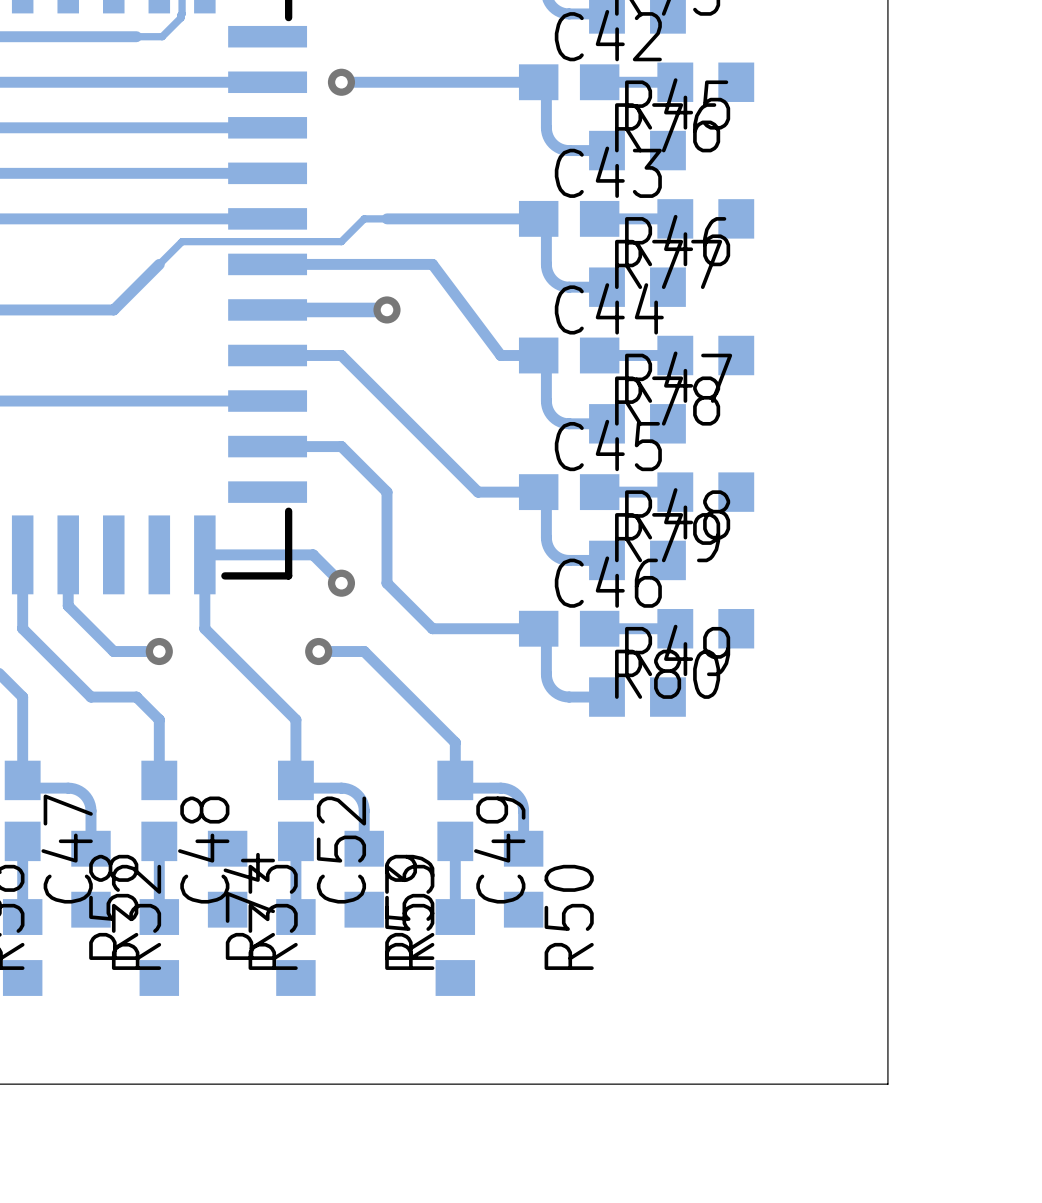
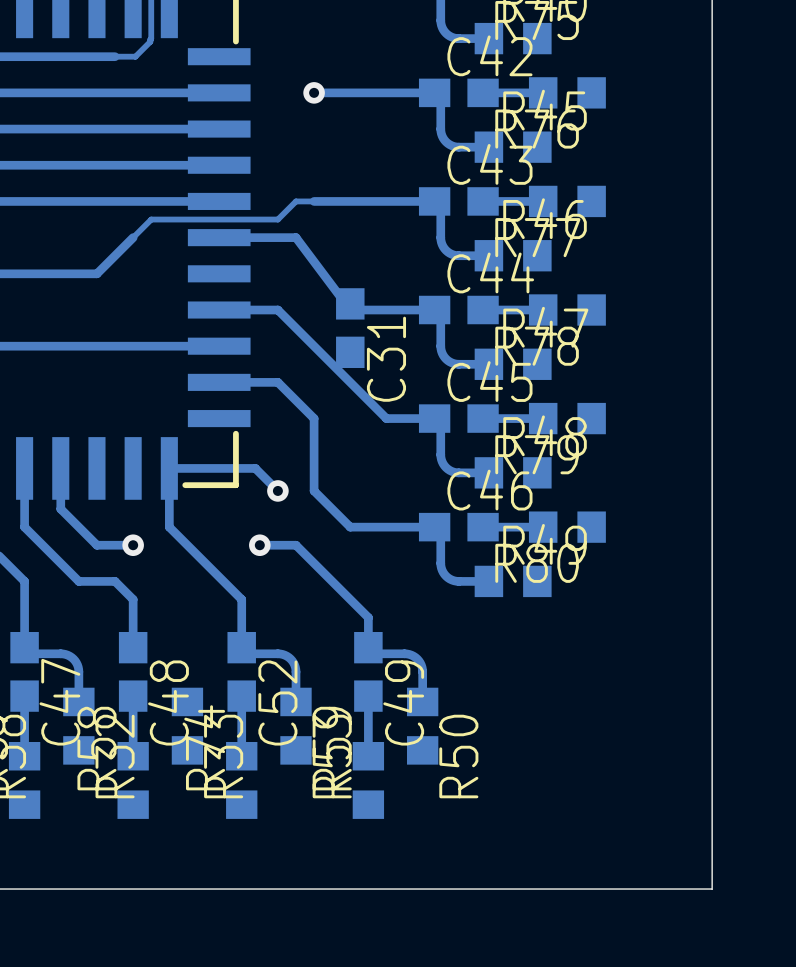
via position: (341, 82) -> (314, 92)
track: (387, 82) (341, 82) -> none
track: (364, 264) (432, 264) (500, 355) -> (296, 237) (350, 310) (404, 310)
track: (387, 309) (267, 309) -> none
via: (387, 309) -> none
C31: none -> (350, 328)

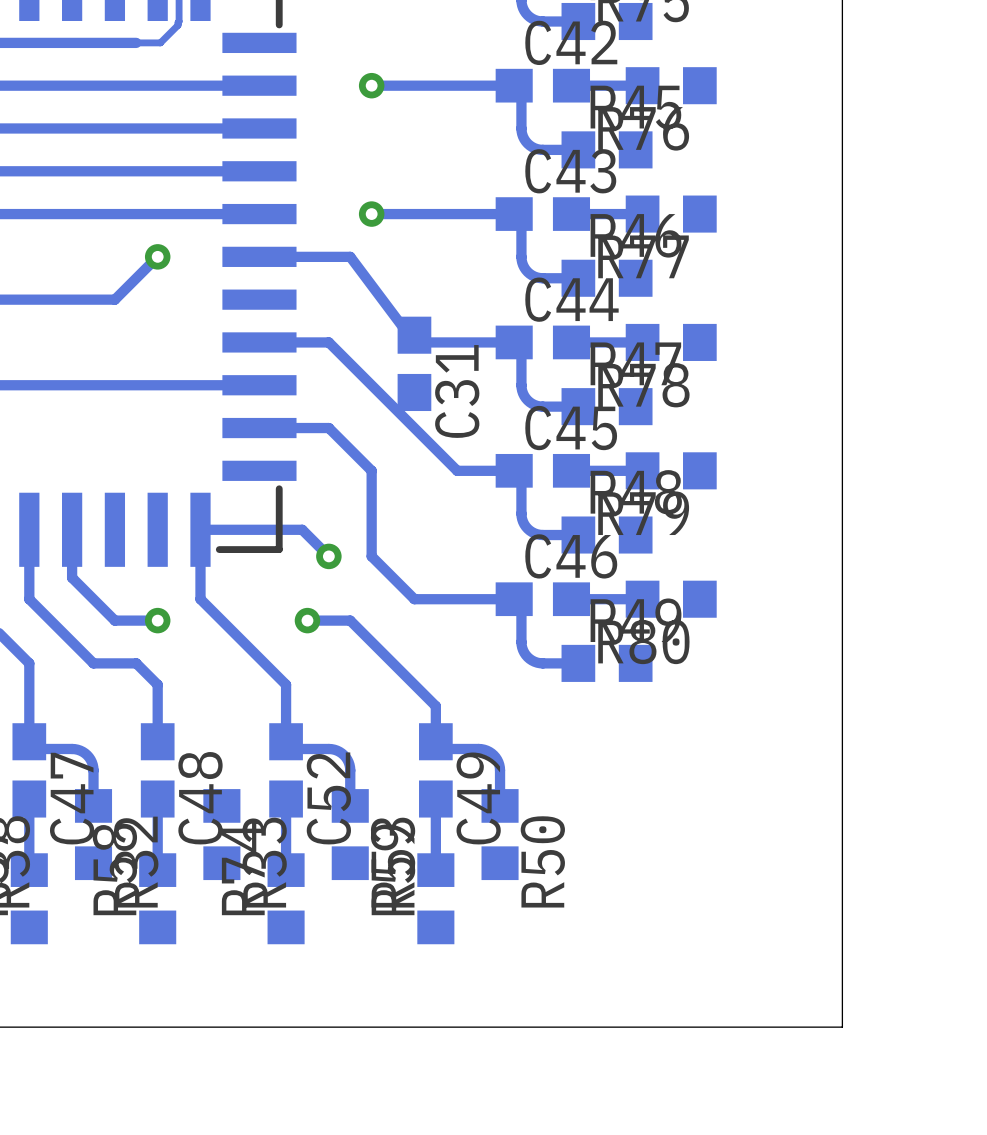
track: (314, 201) (296, 201) (277, 219) (151, 219) (133, 237) -> none
via: none -> (371, 214)
via: none -> (157, 256)

